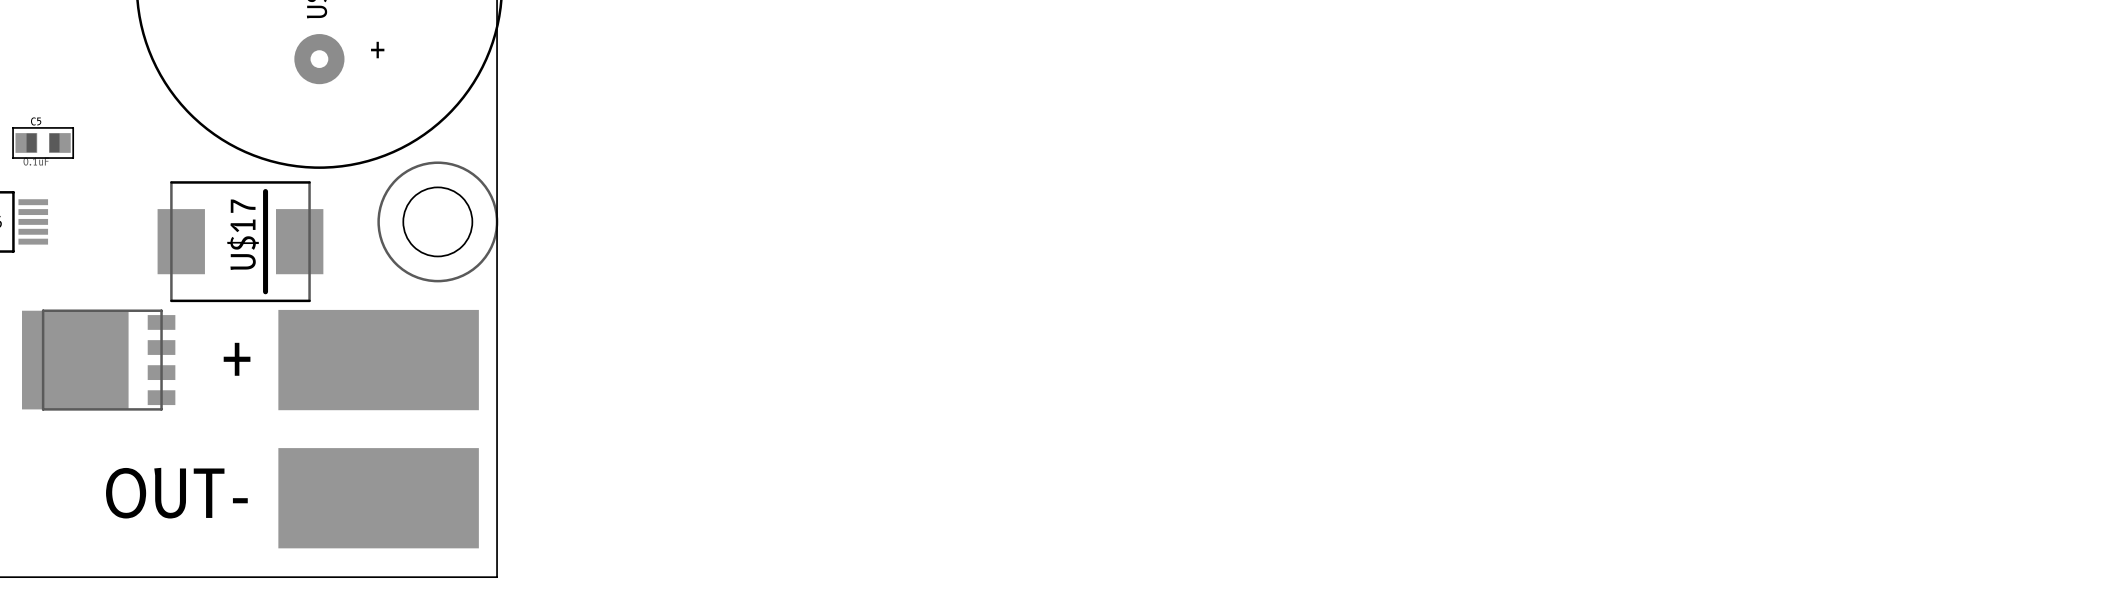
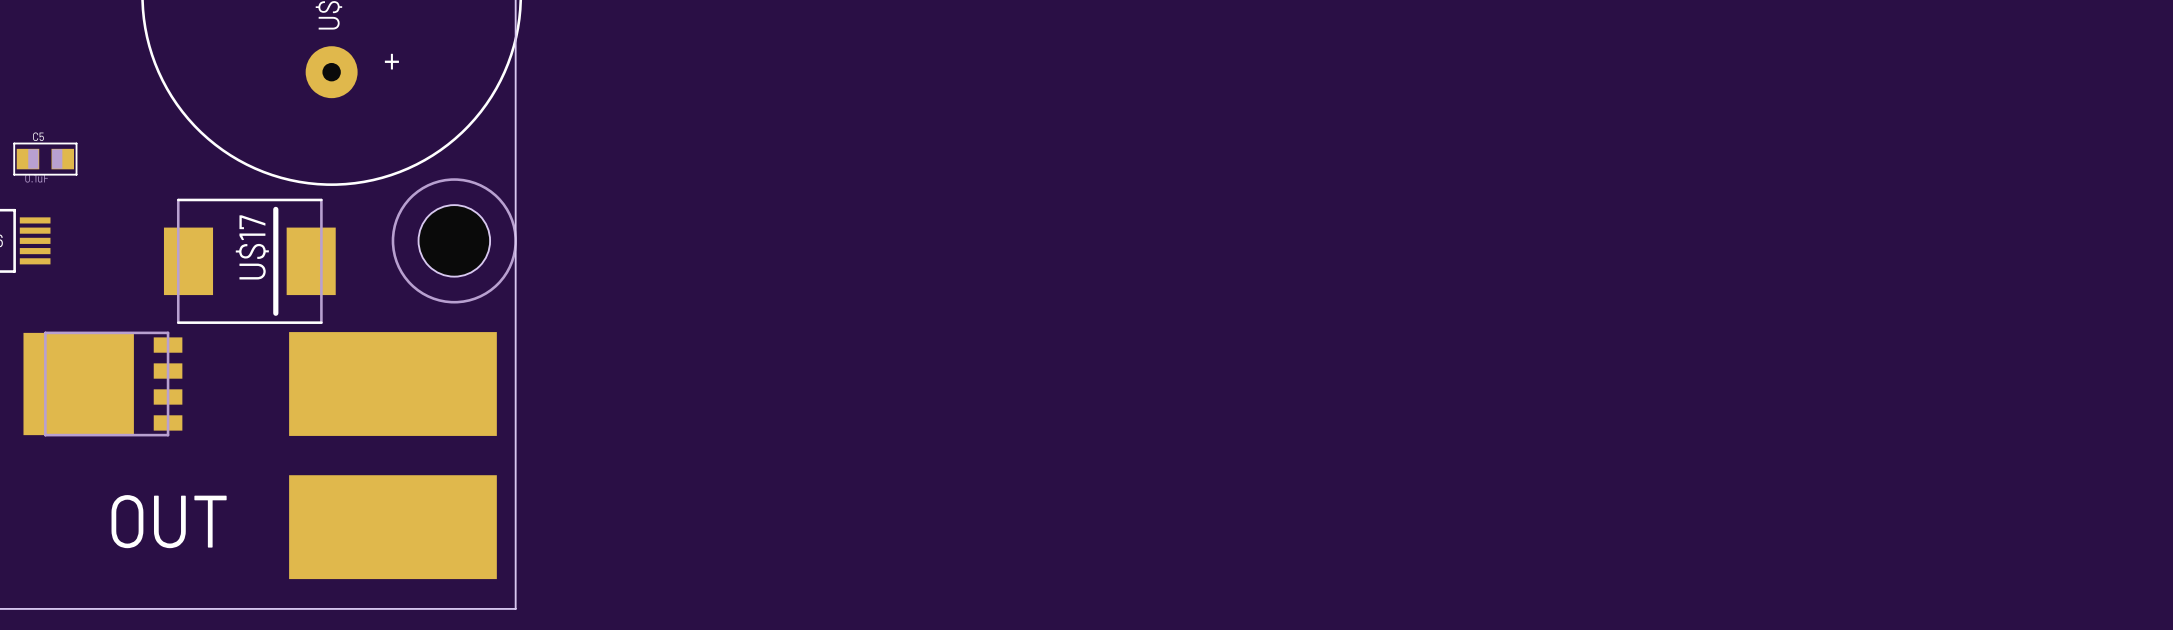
text: + (237, 359) -> none
text: OUT- (176, 493) -> OUT (169, 521)

